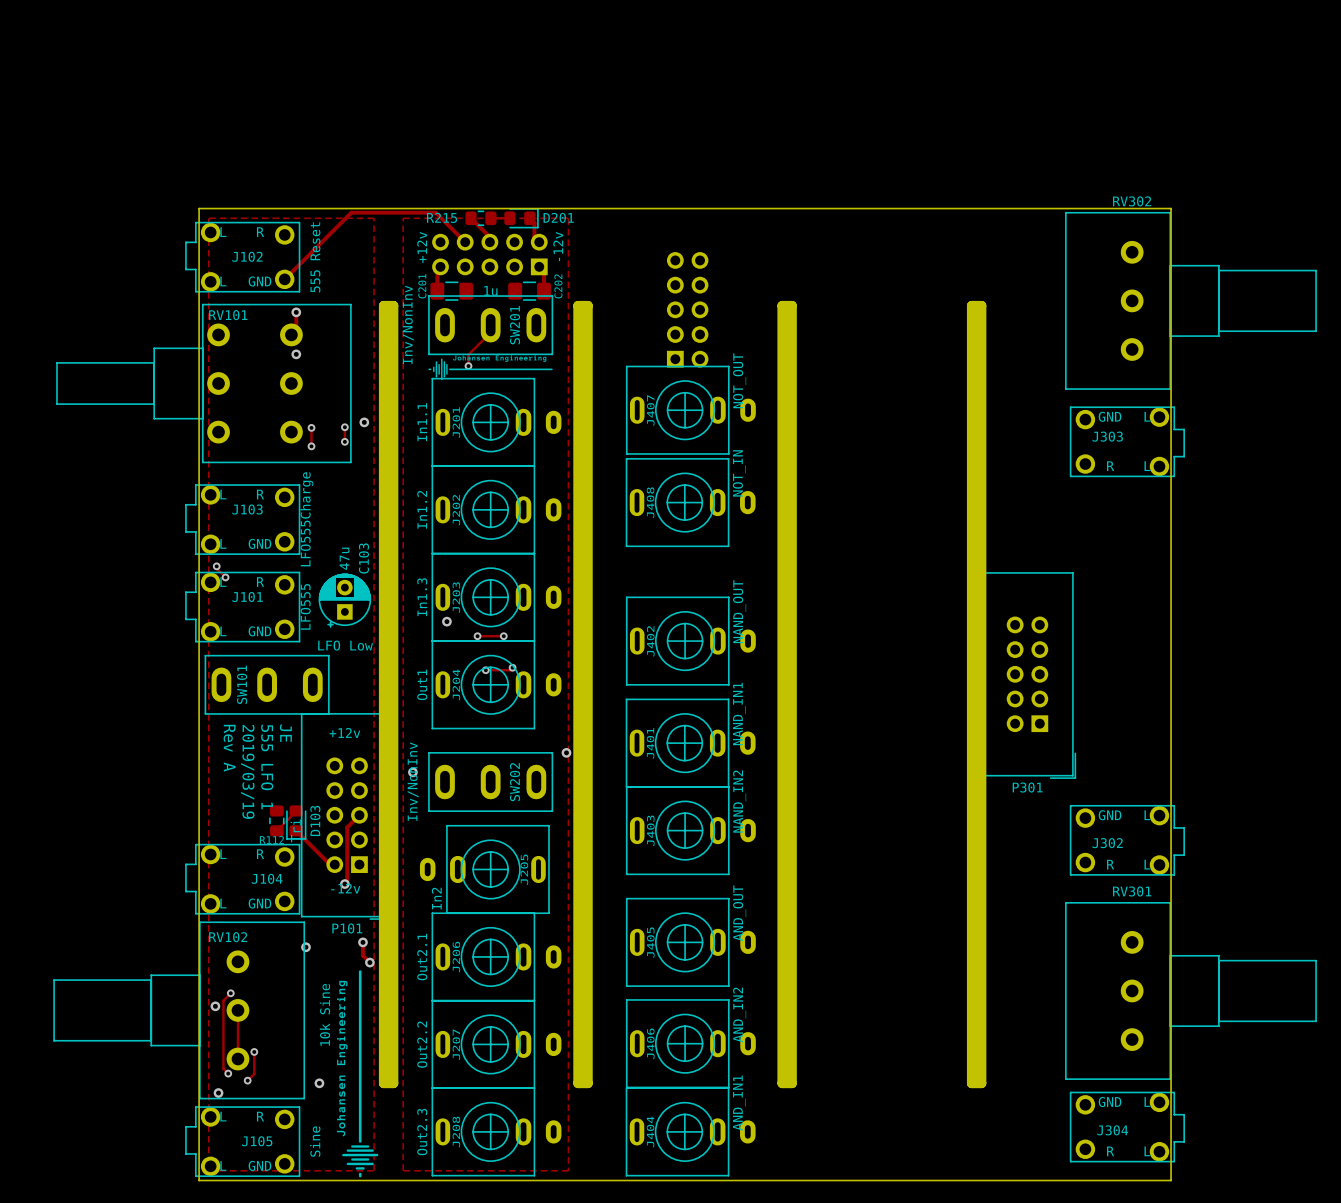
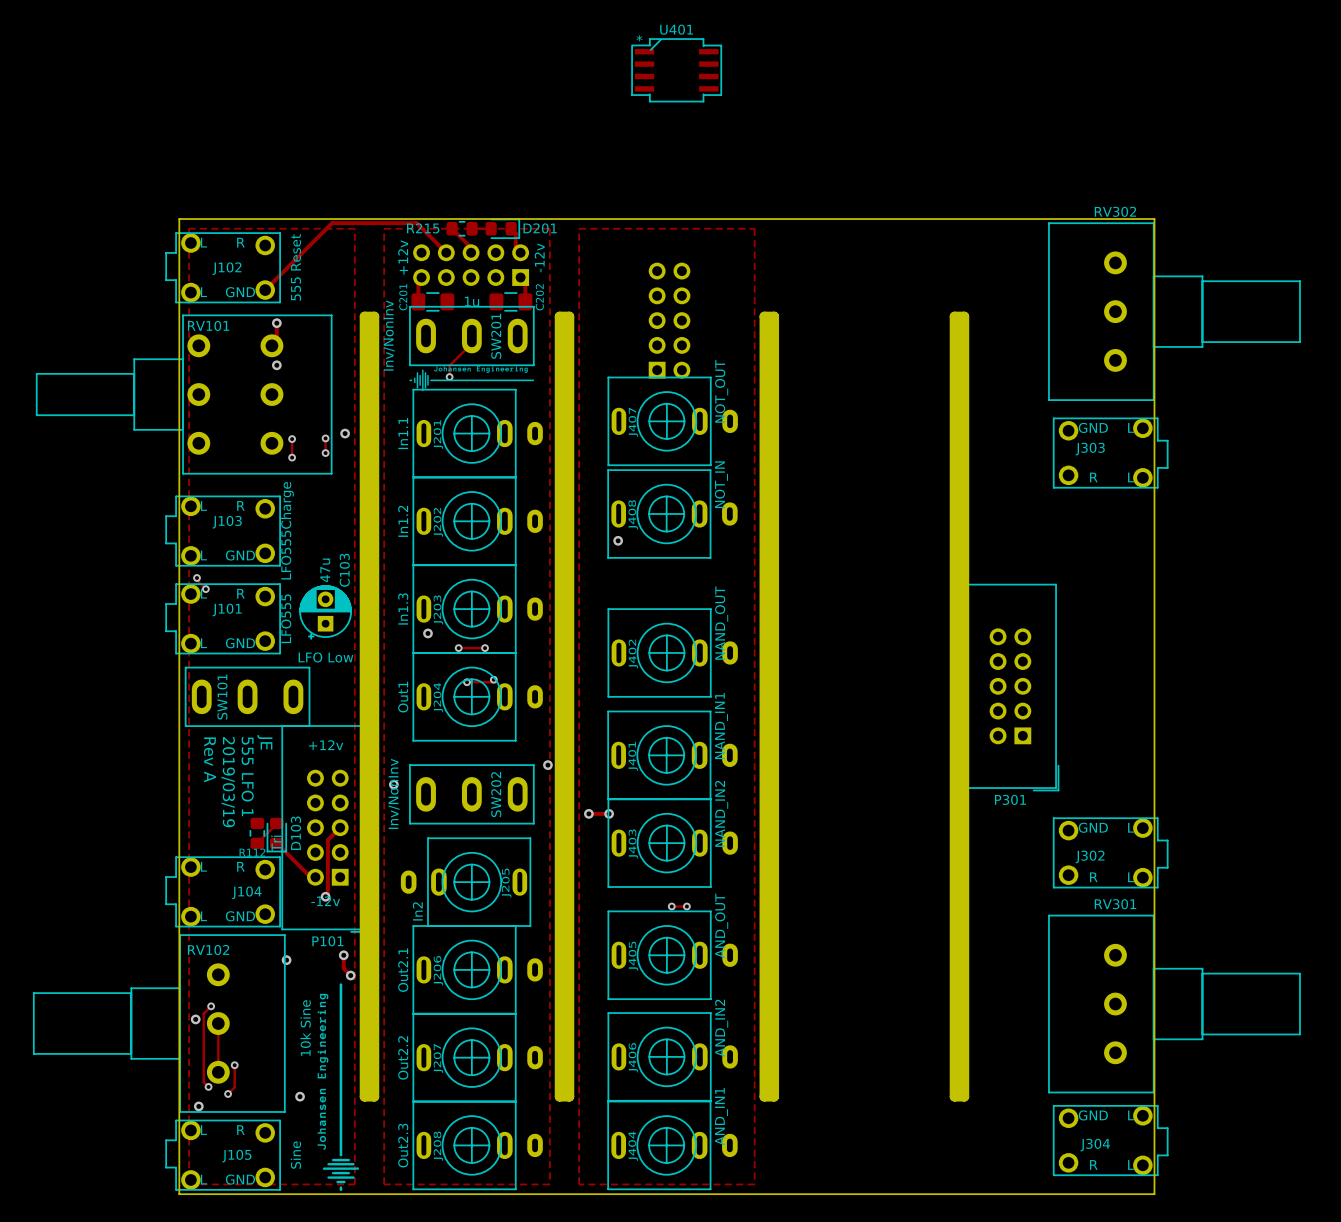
U401: none -> (676, 70)
zone outline: none -> (579, 228) (754, 228) (754, 1184) (579, 1184) (579, 228)
via: none -> (618, 540)
track: none -> (588, 813) (609, 813)
via: none -> (588, 813)
via: none -> (609, 813)
track: none -> (671, 906) (686, 906)
via: none -> (671, 906)
via: none -> (686, 906)

